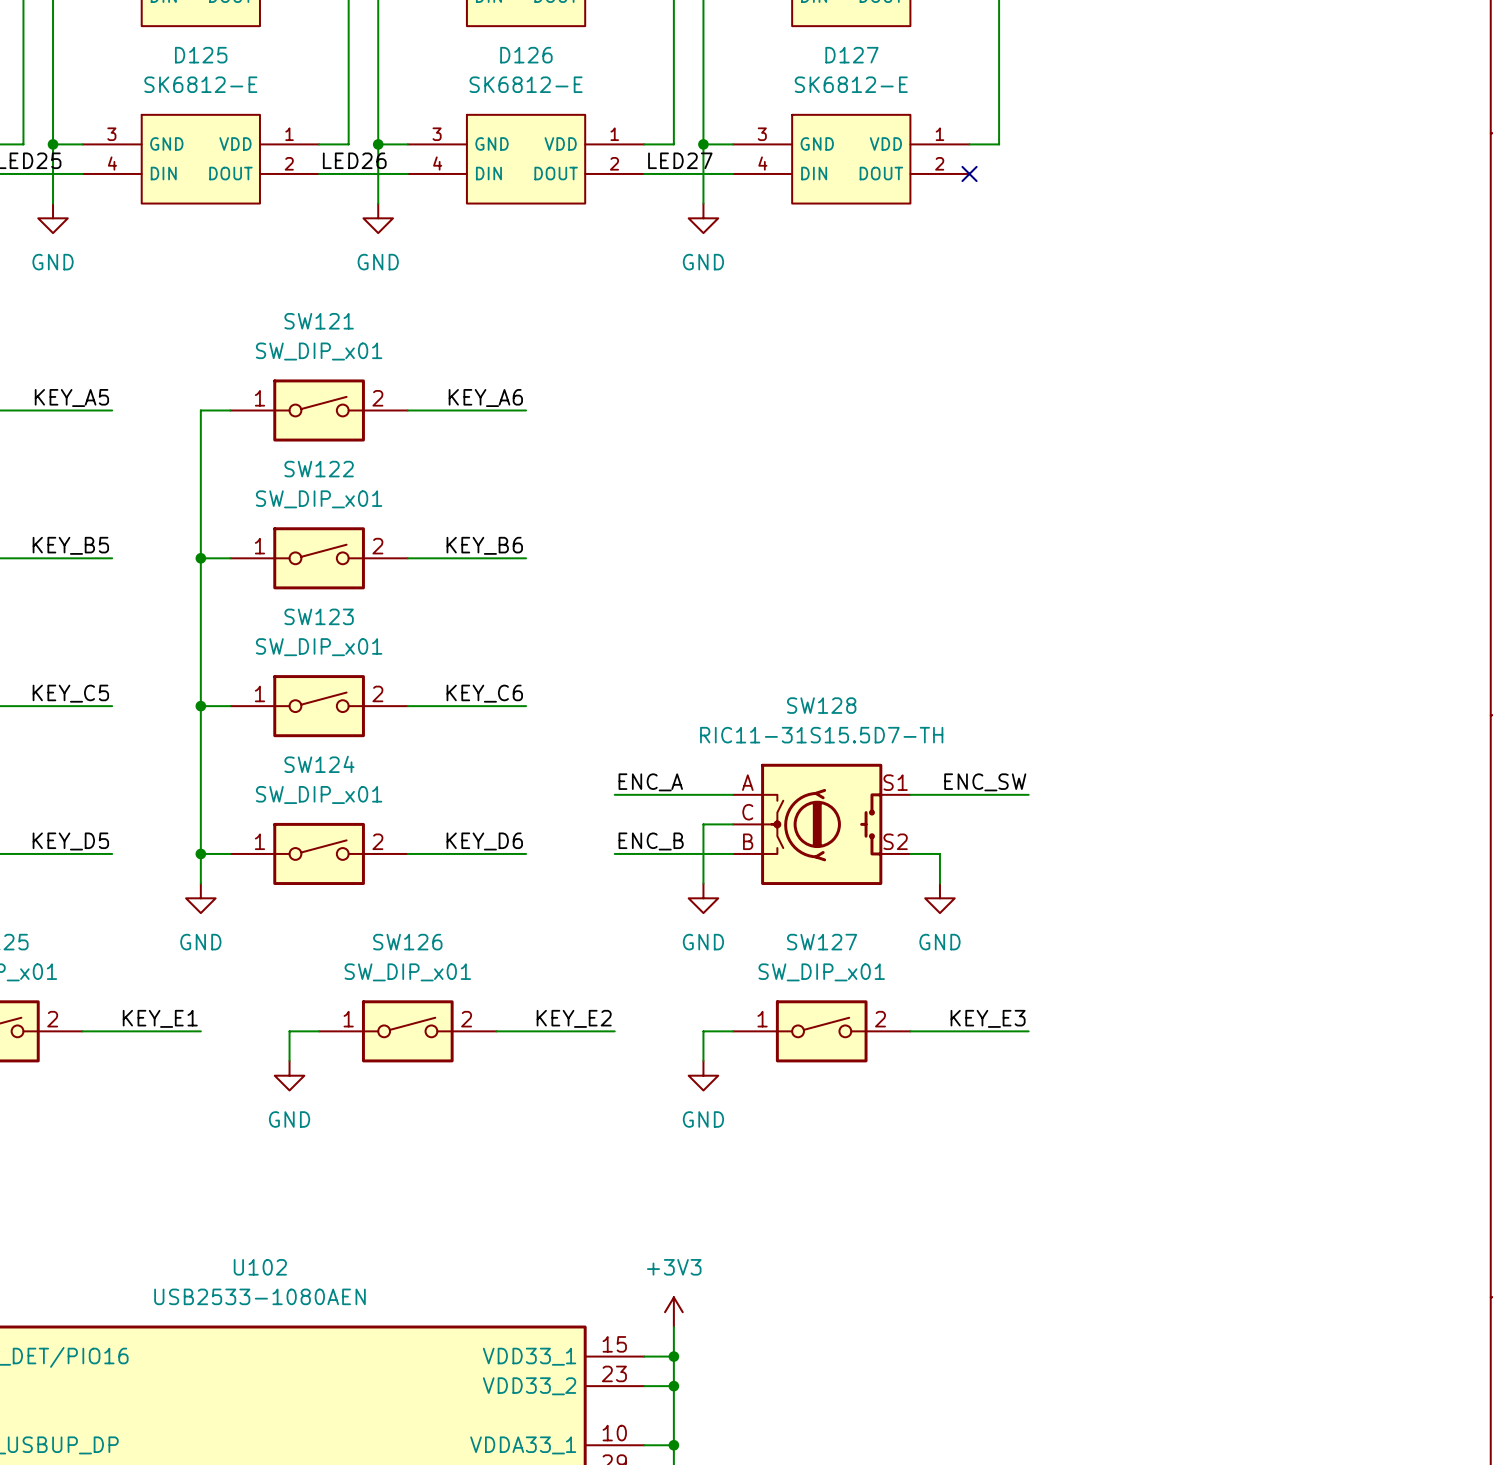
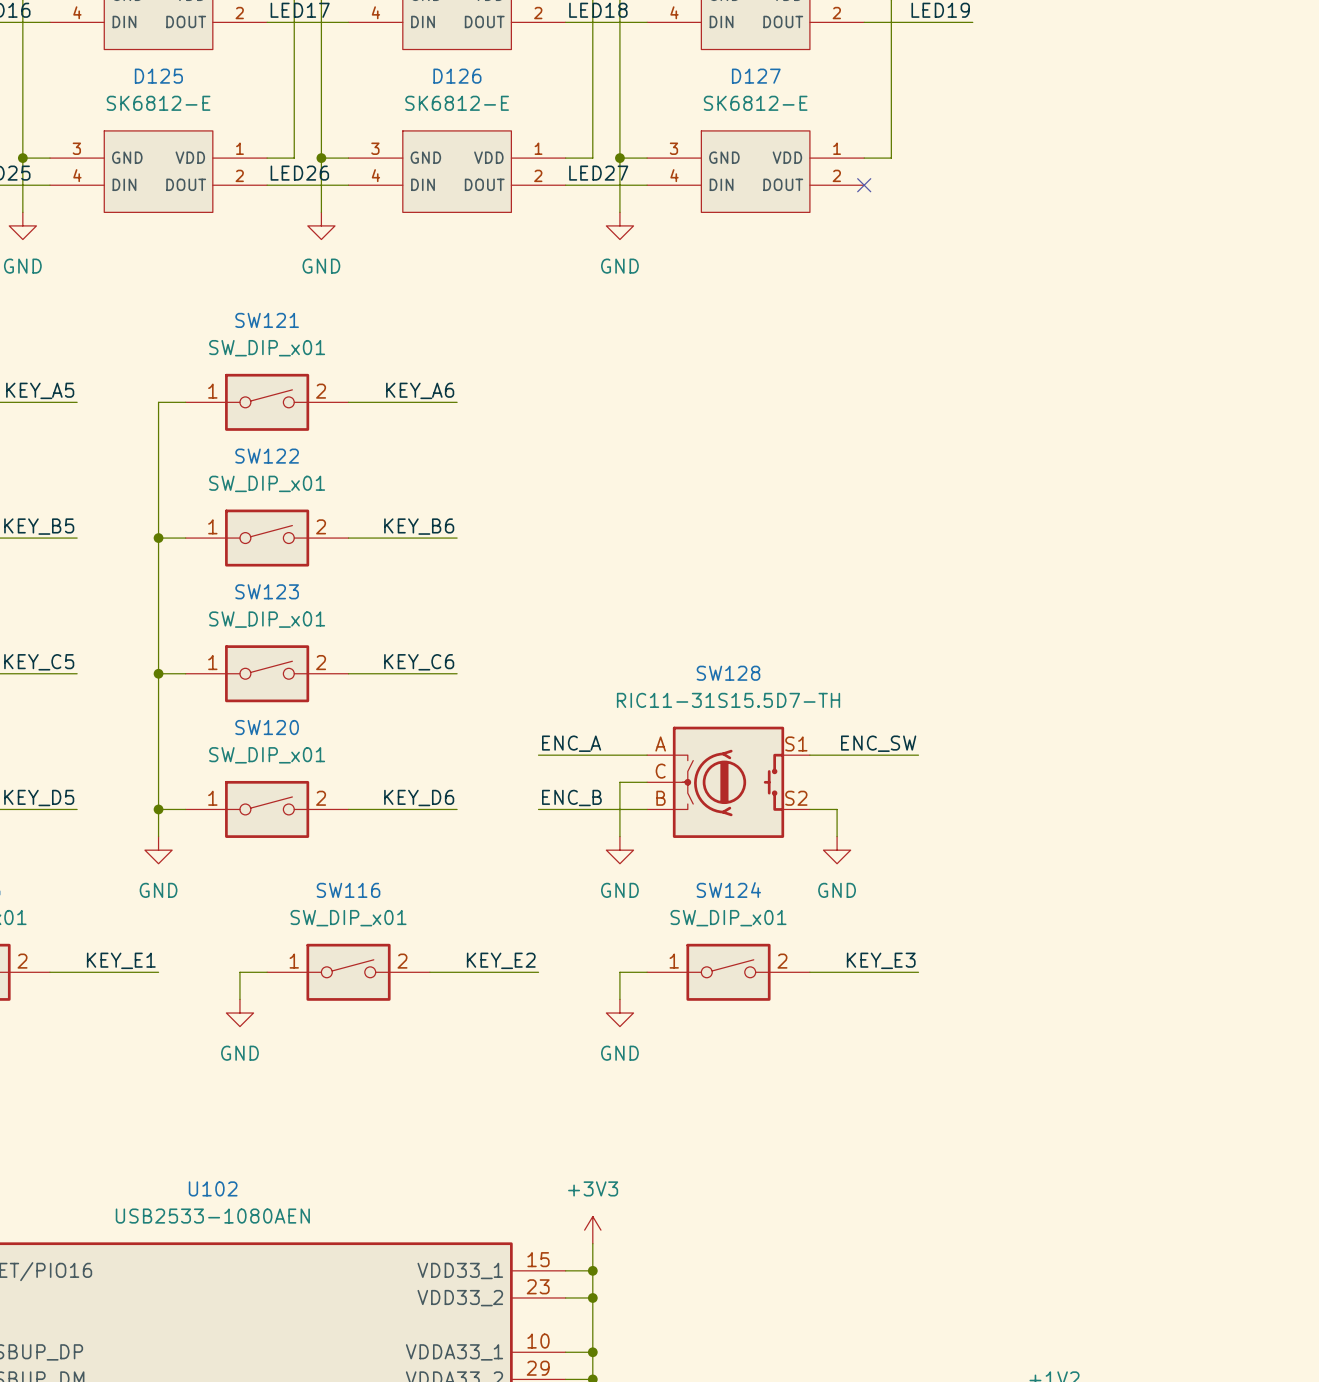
SW124 name: SW124 (319, 764) -> SW120 (267, 727)
SW126 name: SW126 (407, 942) -> SW116 (348, 890)
SW127 name: SW127 (822, 942) -> SW124 (728, 890)

